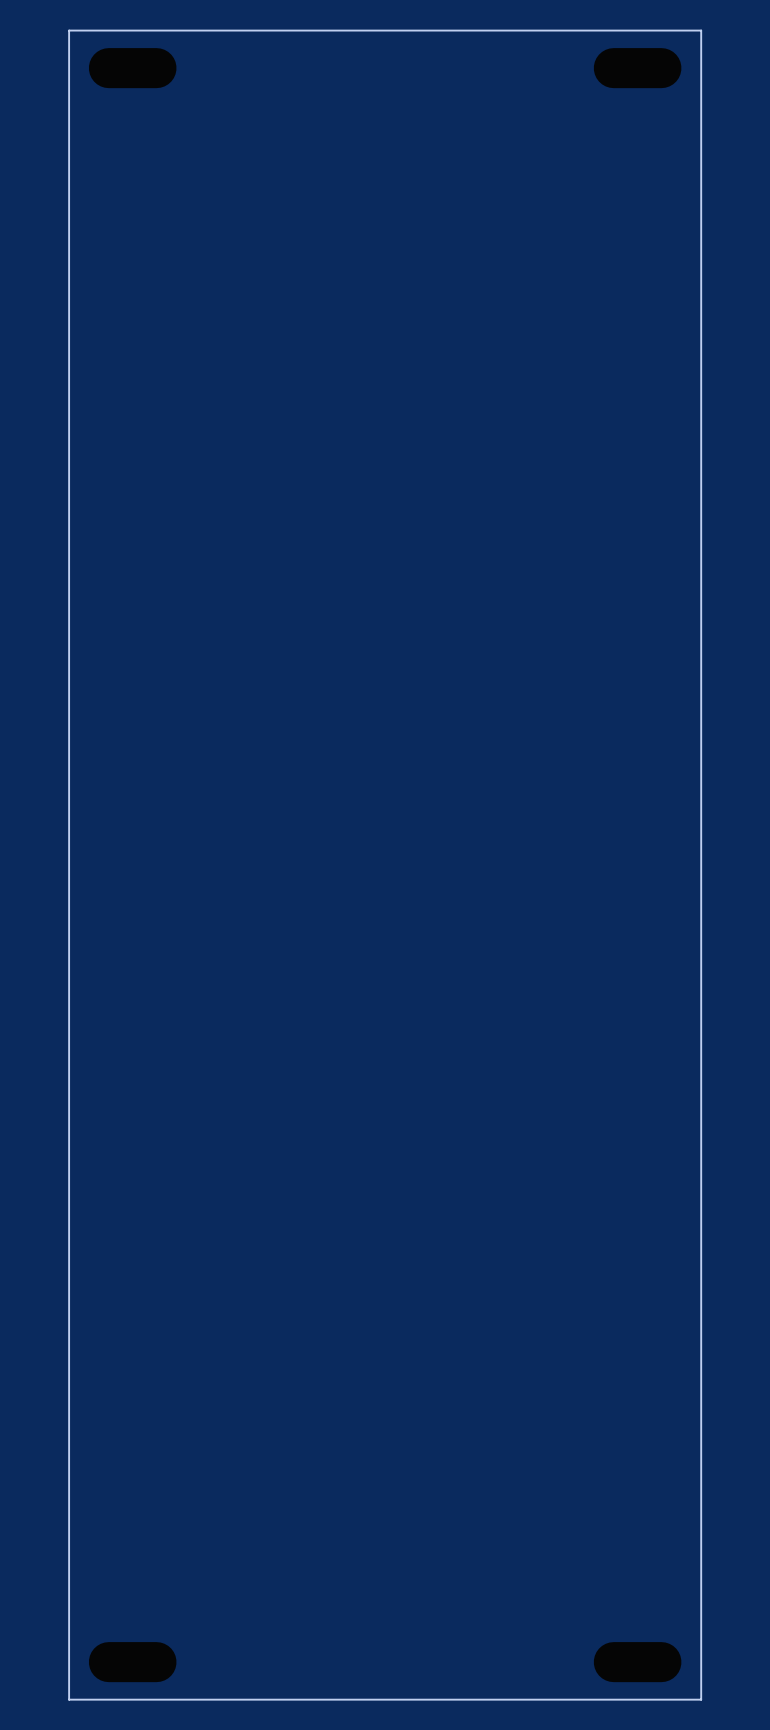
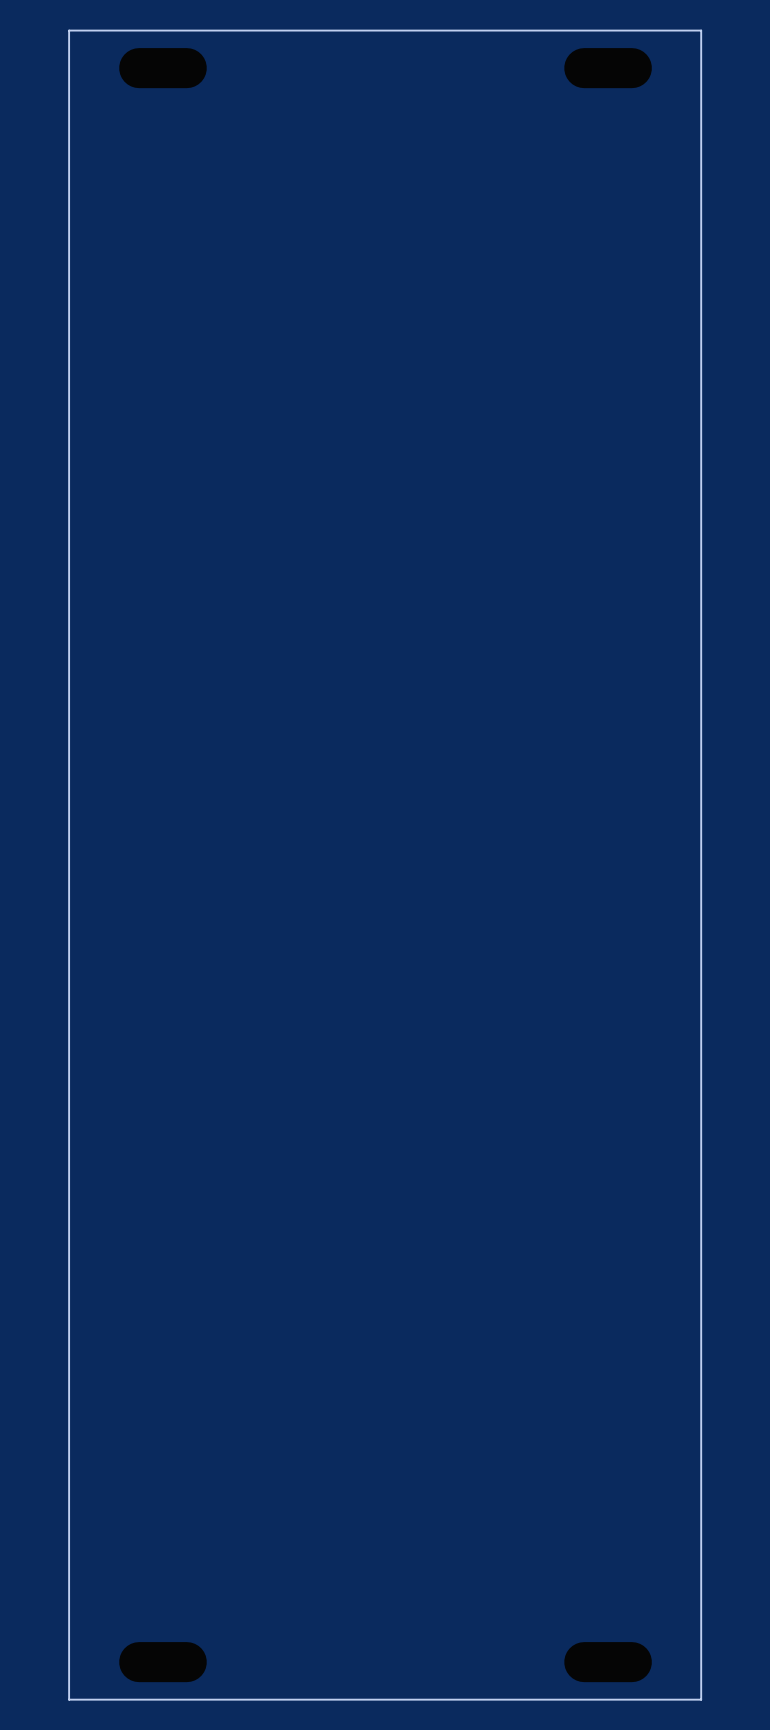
part position: (132, 68) -> (162, 68)
part position: (637, 68) -> (608, 68)
part position: (132, 1662) -> (162, 1662)
part position: (637, 1662) -> (608, 1662)

